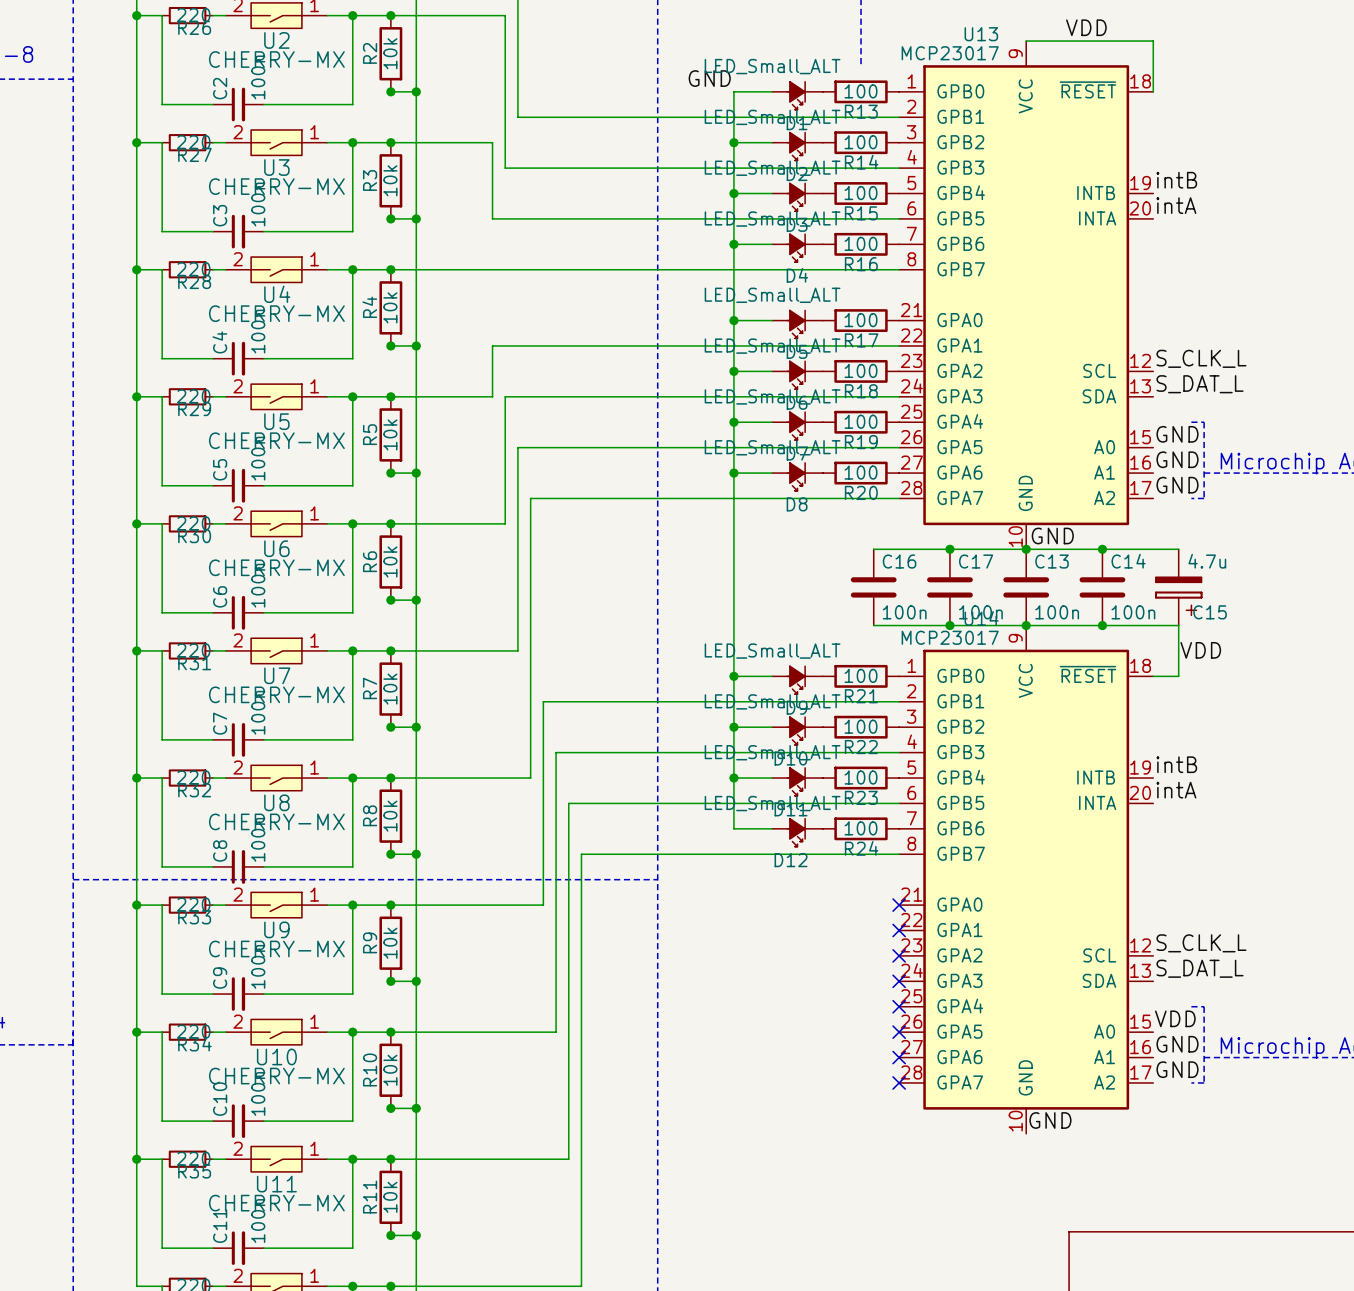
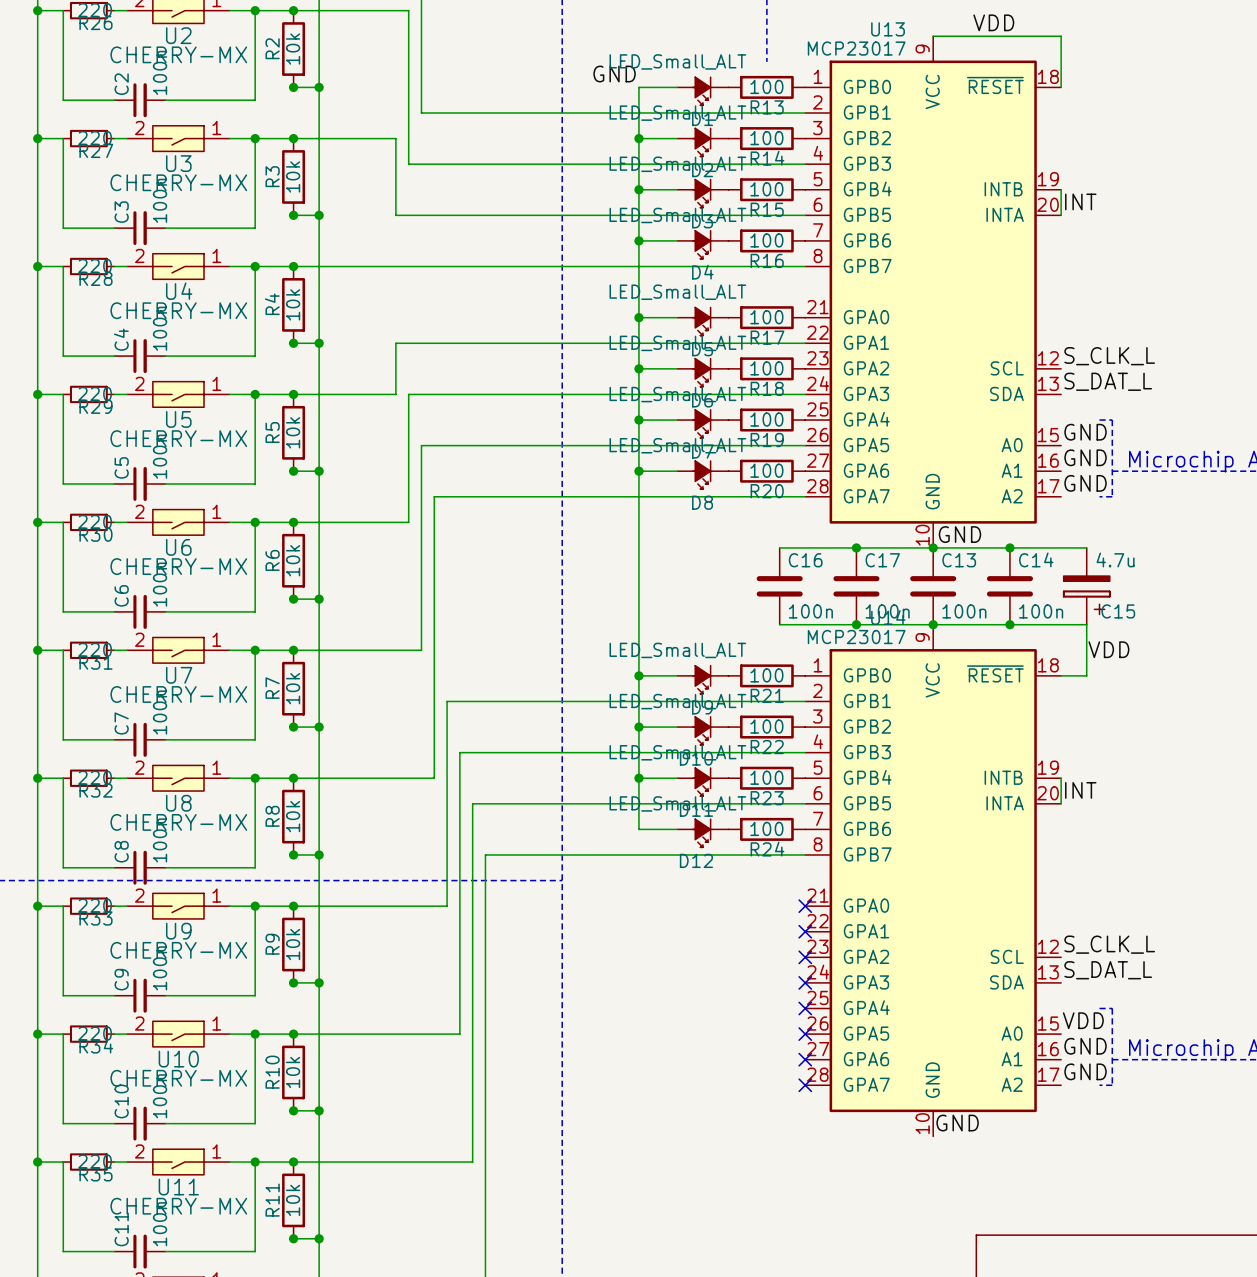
label: intB (1176, 180) -> none
wire: none -> (1061, 189) (1061, 215)
label: intA (1176, 205) -> INT (1080, 201)
label: intB (1176, 764) -> none
wire: none -> (1061, 778) (1061, 803)
label: intA (1176, 790) -> INT (1080, 790)

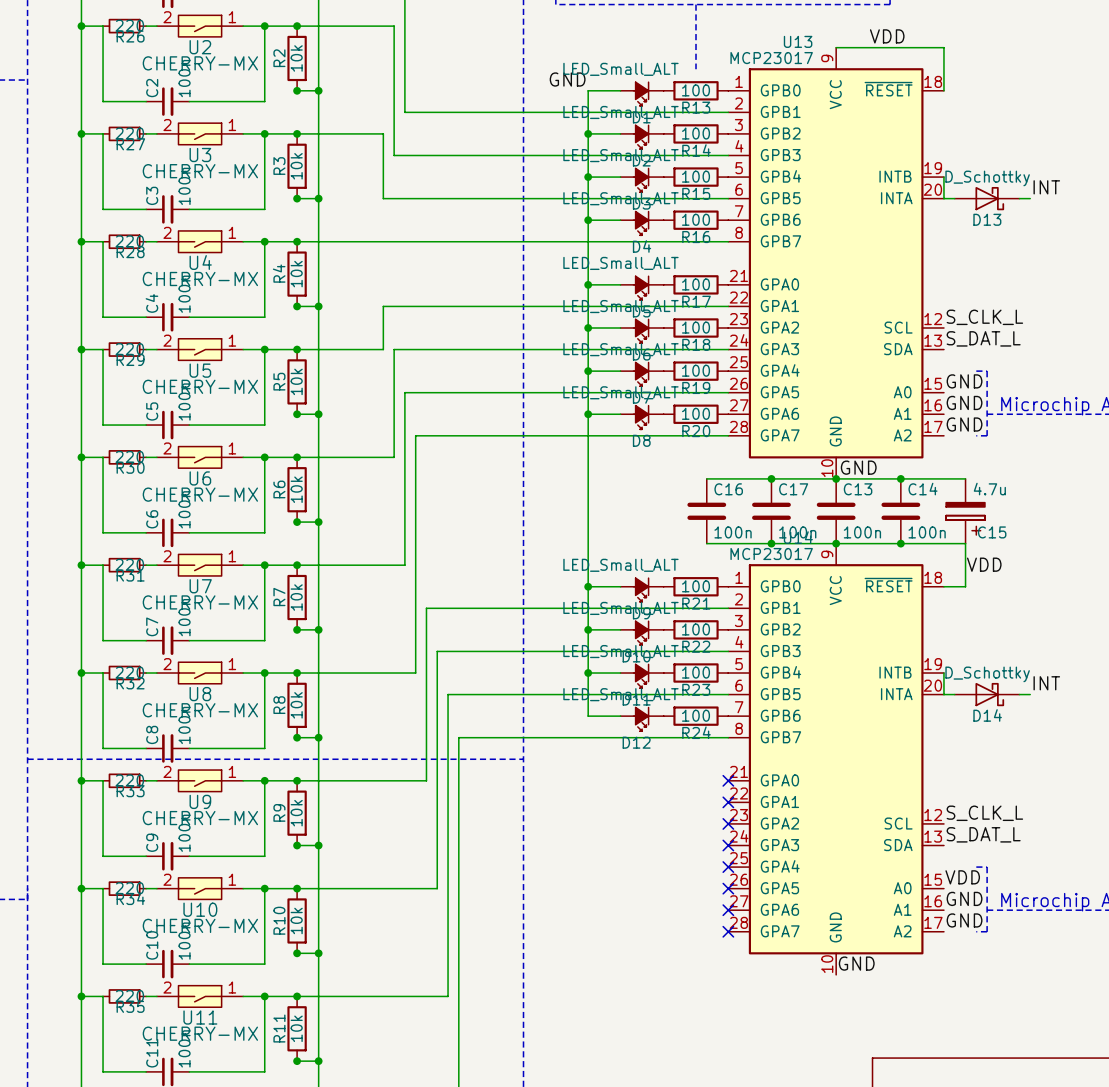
label position: INT (1080, 201) -> INT (1046, 187)
wire: none -> (943, 198) (954, 198)
D13: none -> D_Schottky (987, 198)
wire: none -> (1019, 198) (1030, 198)
label position: INT (1080, 790) -> INT (1046, 683)
wire: none -> (943, 694) (954, 694)
D14: none -> D_Schottky (987, 694)
wire: none -> (1019, 694) (1030, 694)

